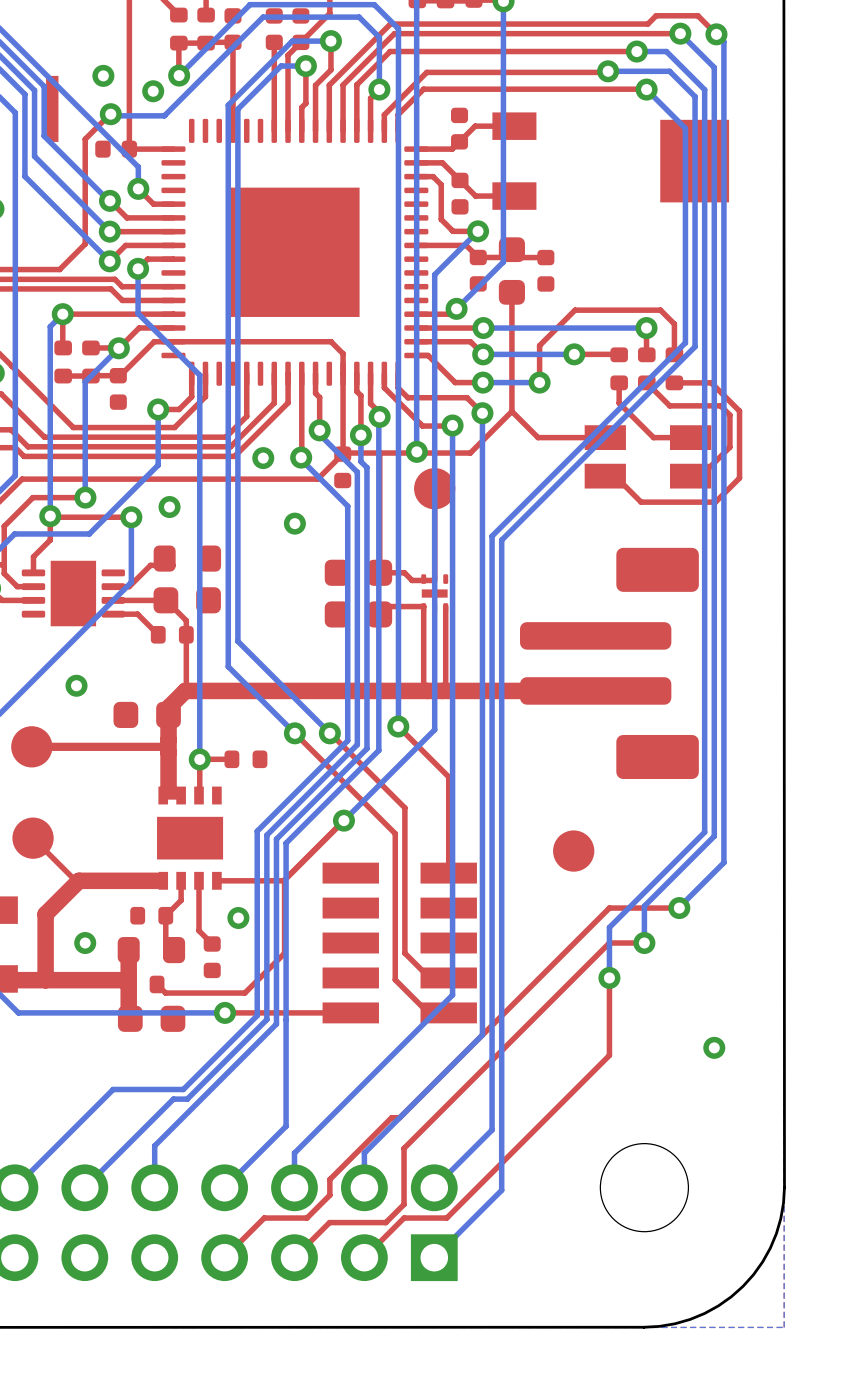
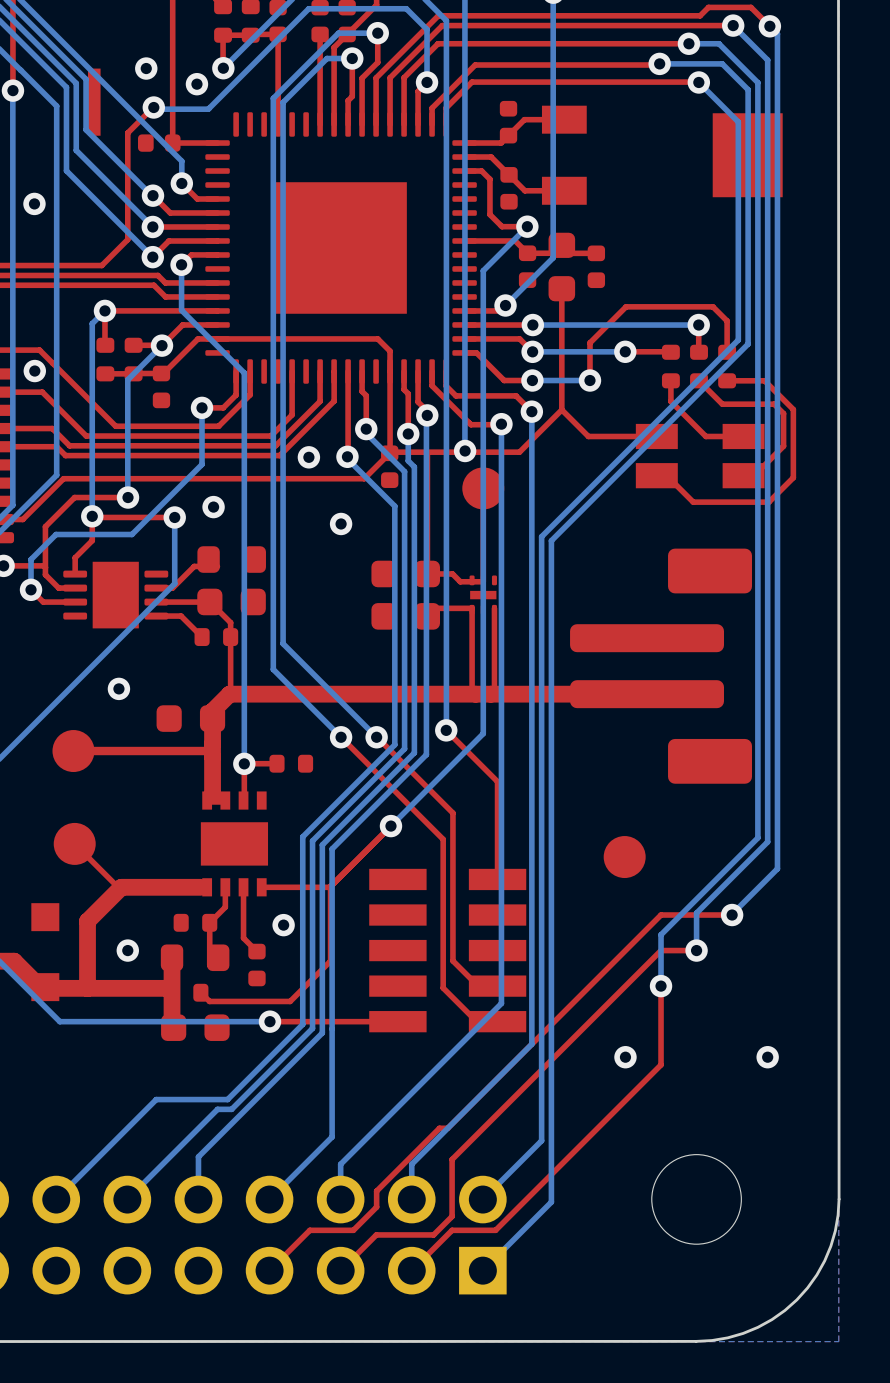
via: none -> (625, 1057)

